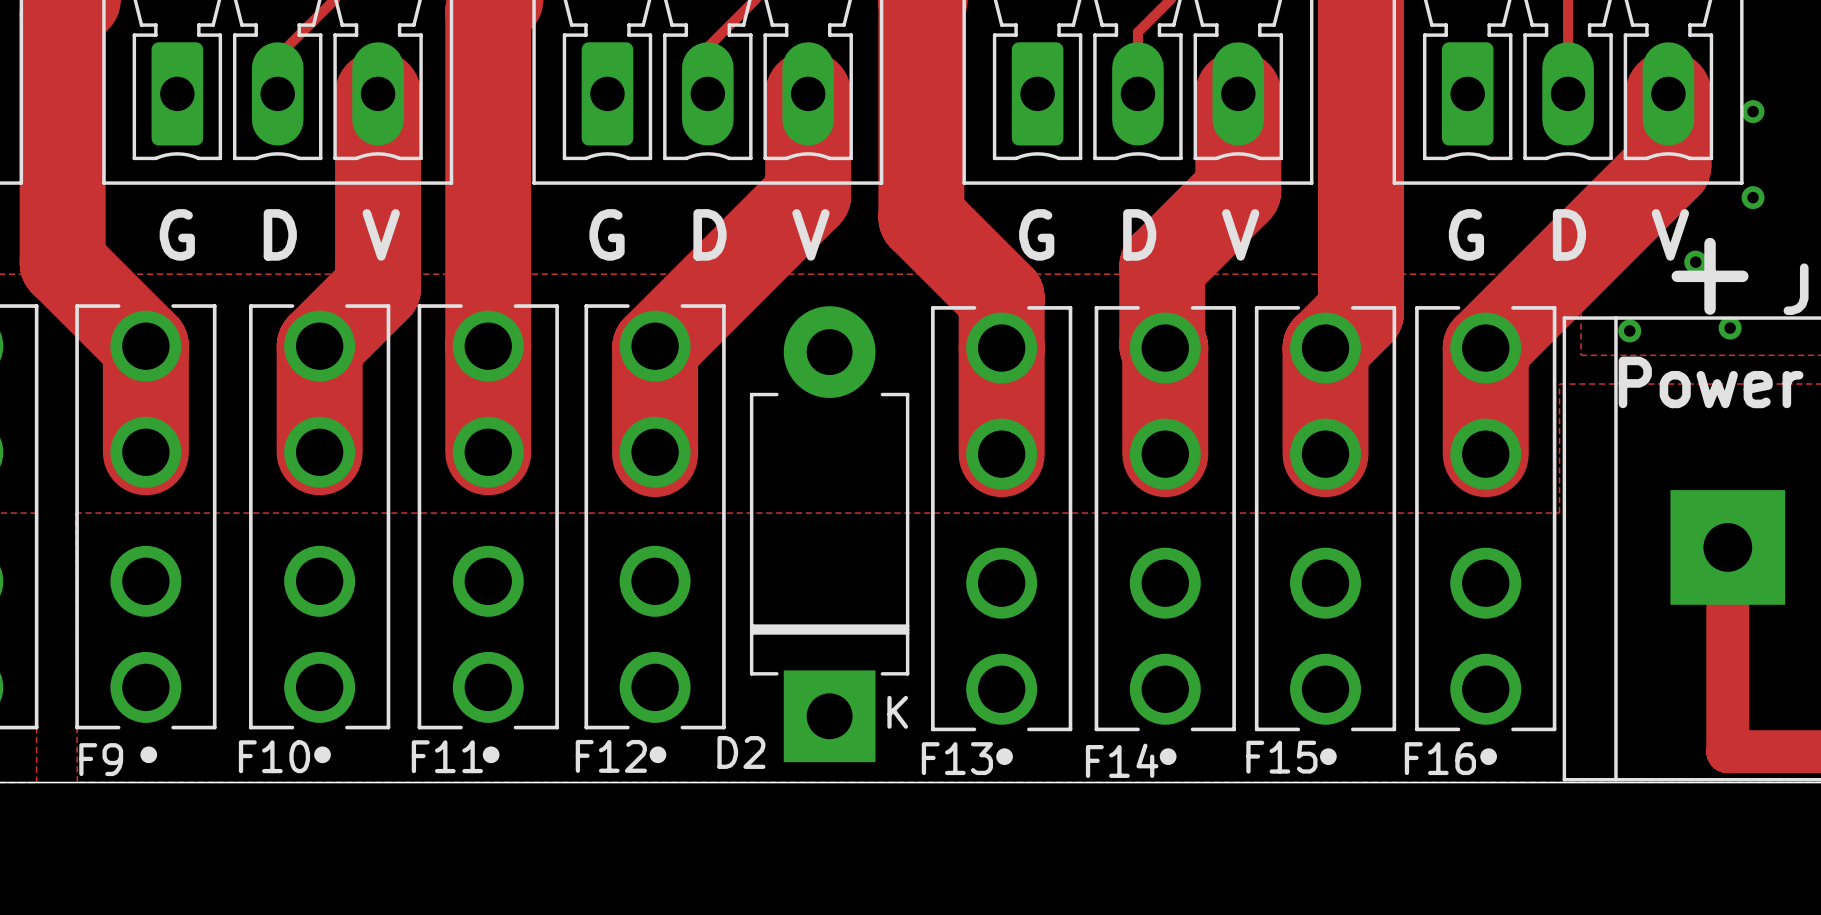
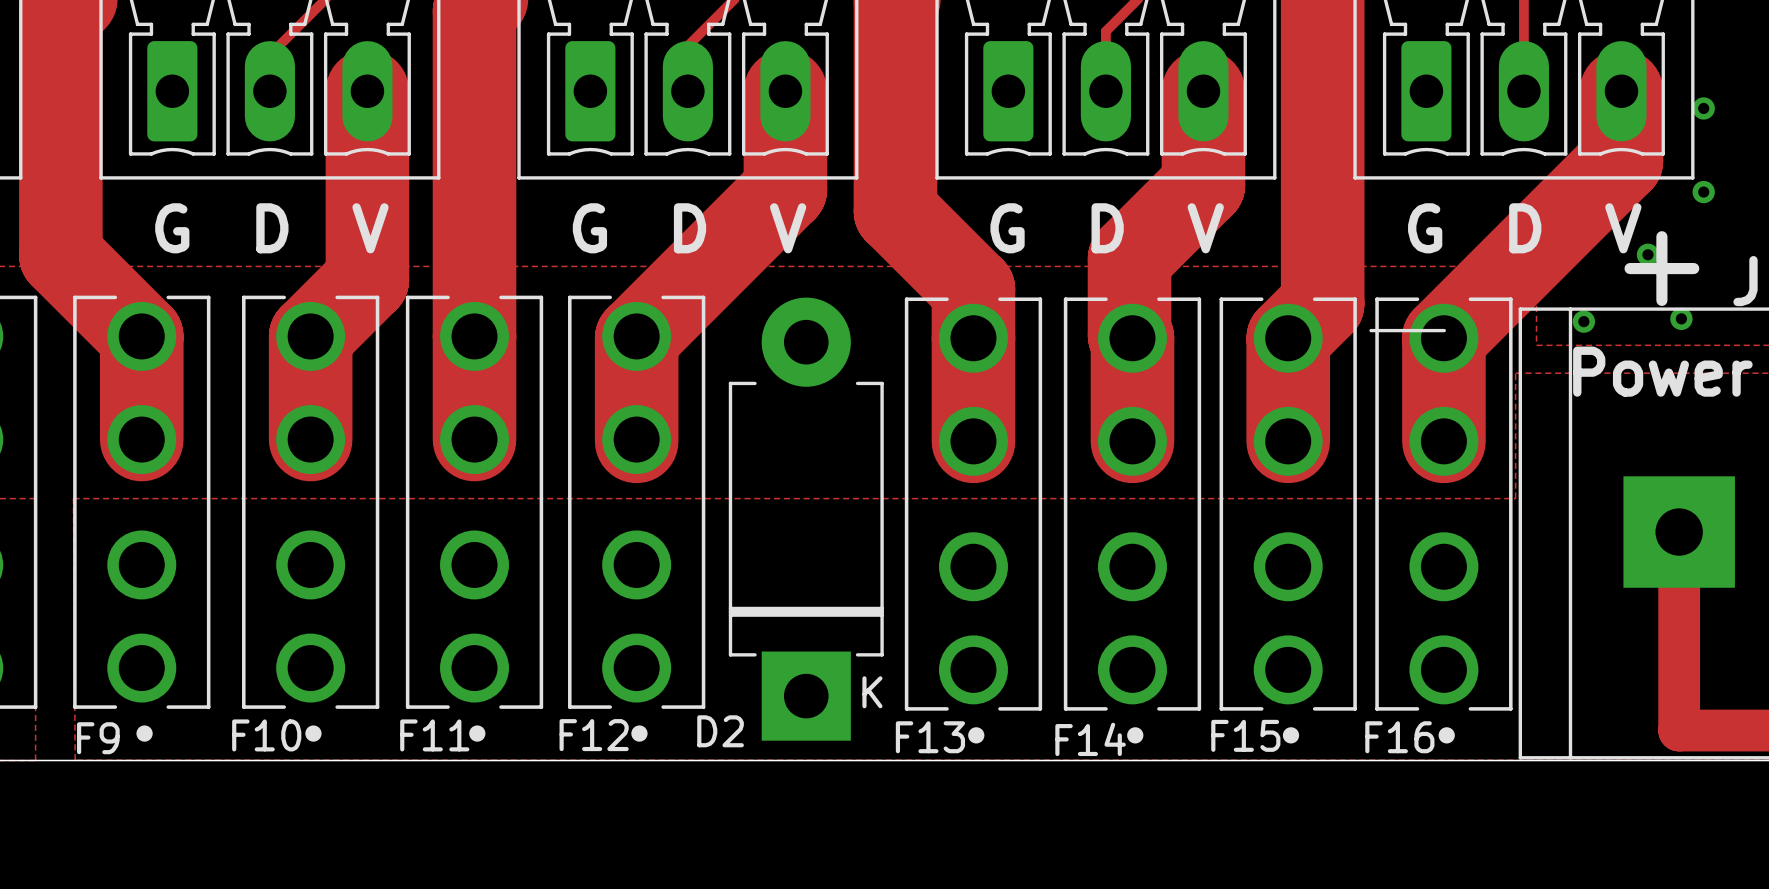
line: none -> (1371, 330) (1444, 330)

